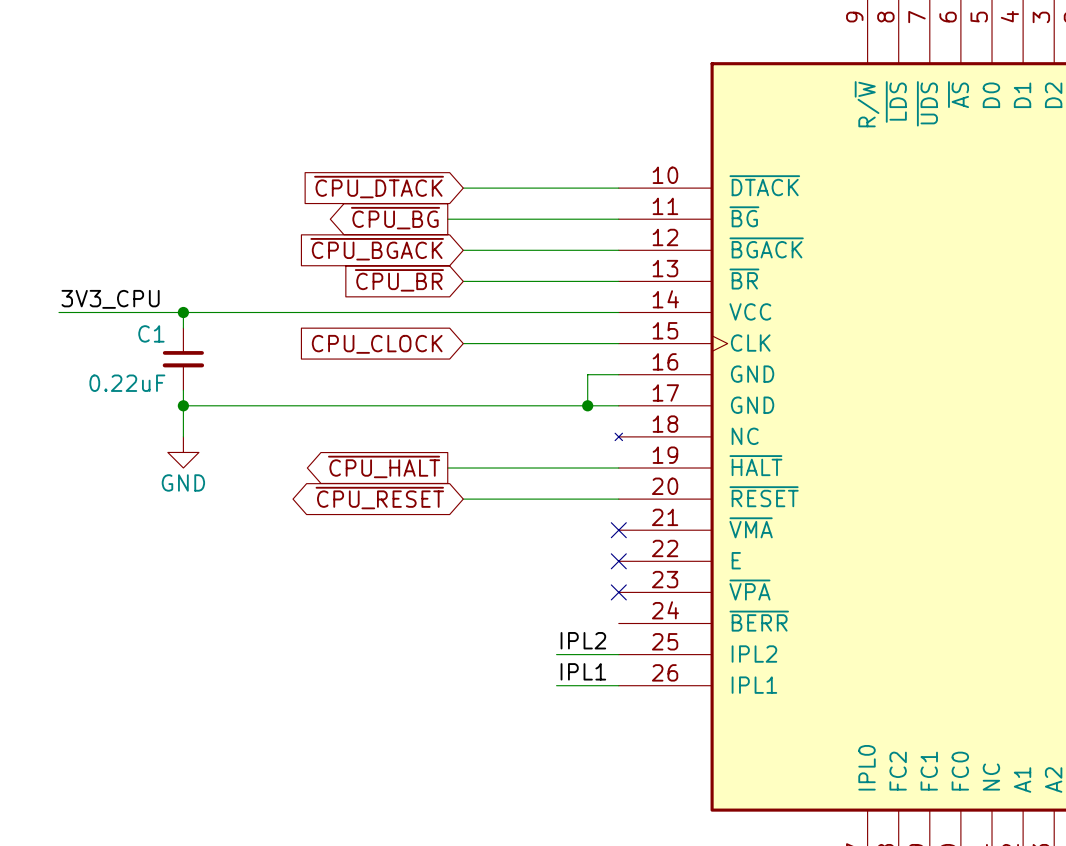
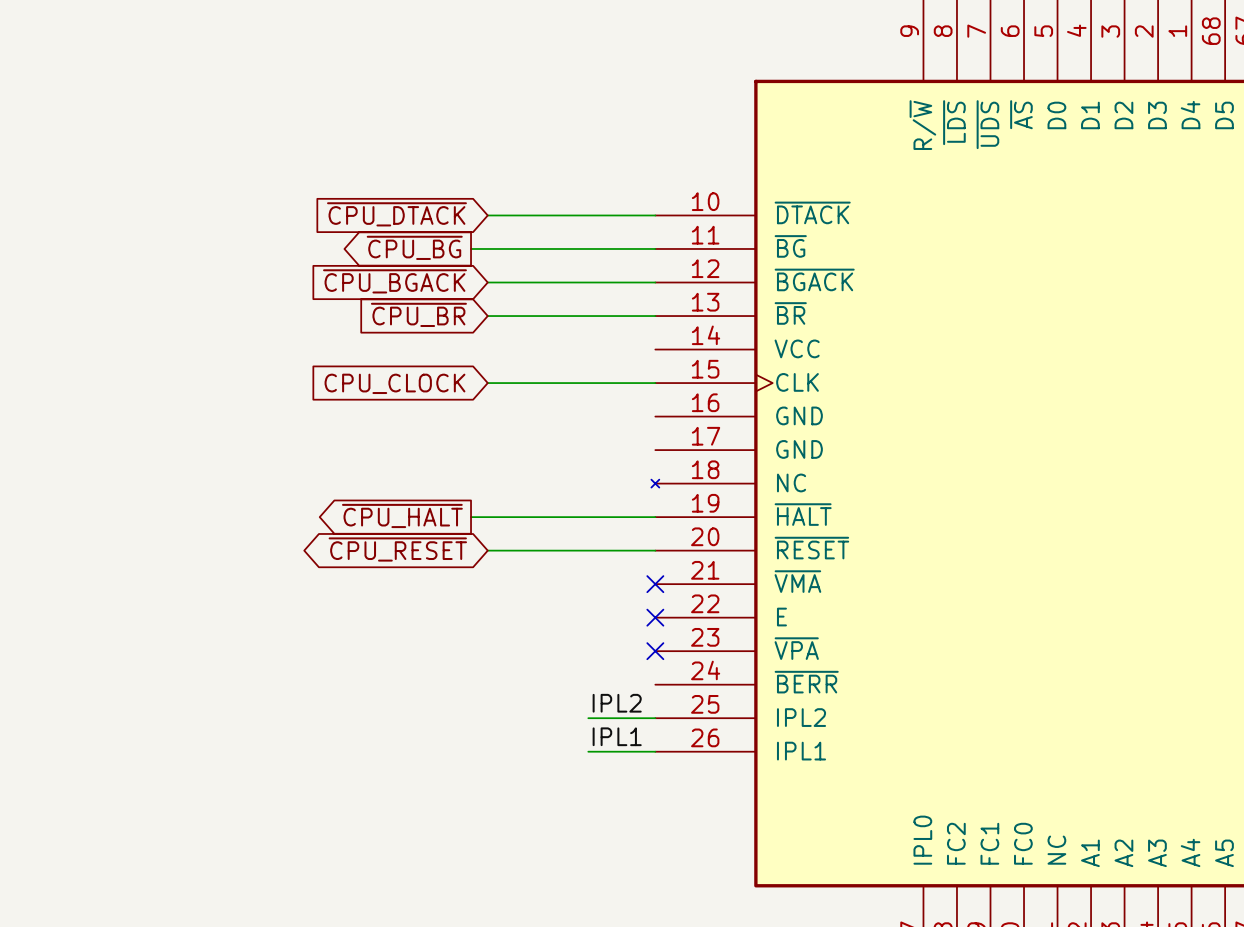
label: 3V3_CPU (110, 299) -> none
wire: (58, 312) (618, 312) -> none
wire: (183, 312) (183, 328) -> none
junction: (183, 312) -> none
C1: 0.22uF (183, 359) -> none
wire: (618, 374) (587, 374) (587, 405) -> none
wire: (183, 390) (183, 436) -> none
wire: (183, 405) (618, 405) -> none
junction: (183, 405) -> none
junction: (587, 405) -> none
power symbol: GND (183, 452) -> none

